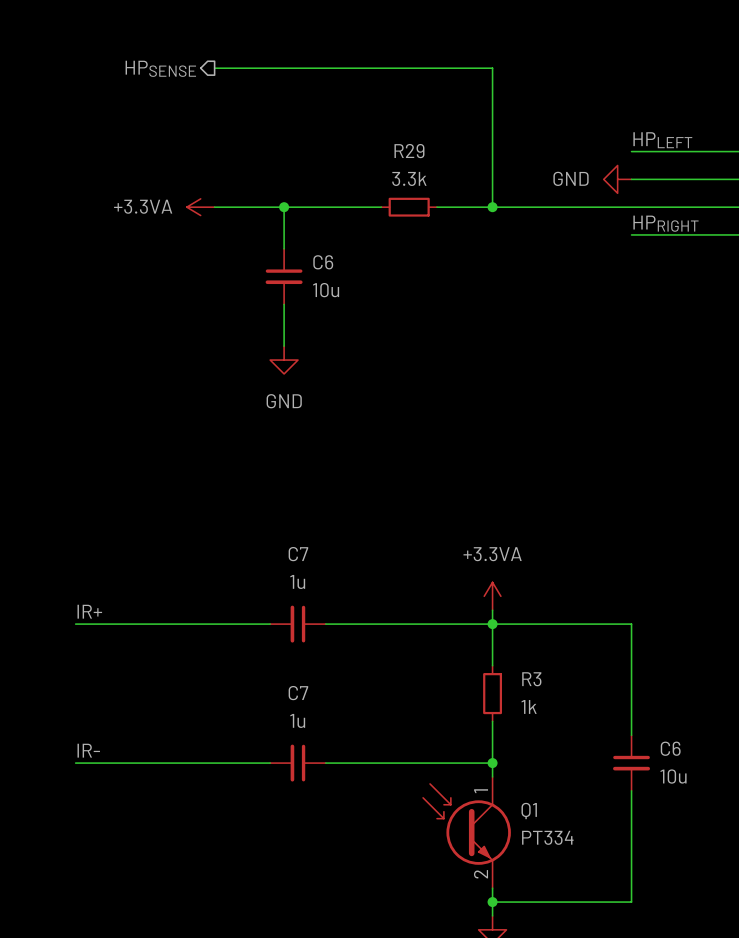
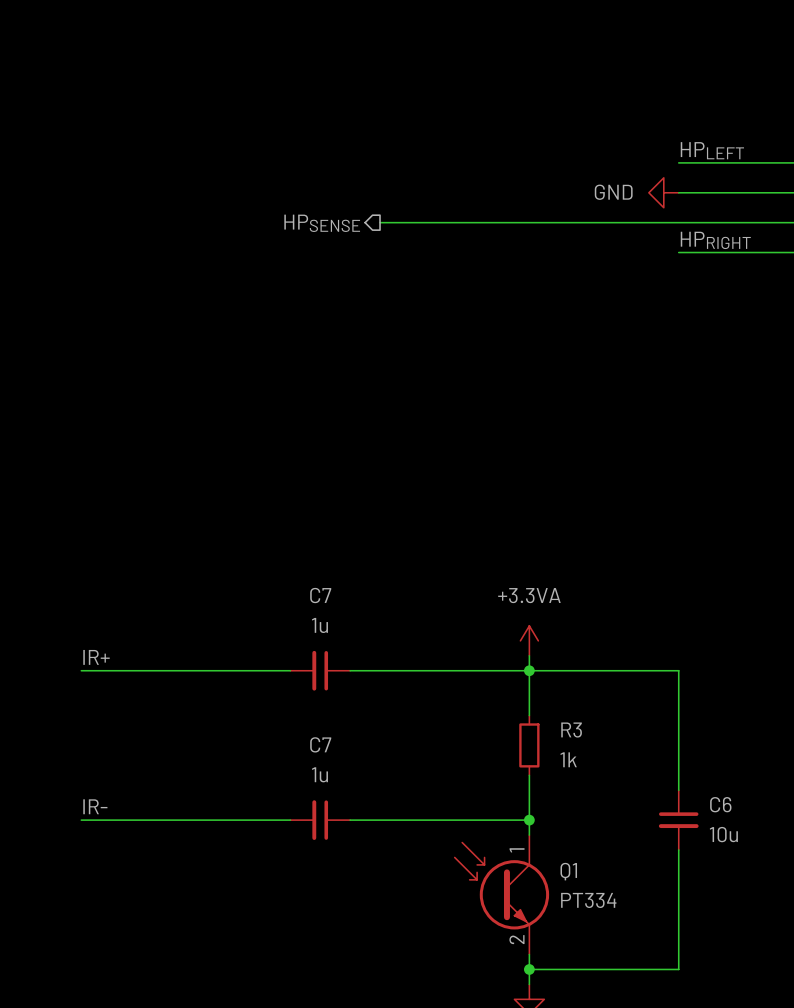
hierarchical label position: HPSENSE (160, 68) -> HPSENSE (322, 223)
wire: (214, 68) (492, 68) (492, 207) -> none
power symbol: +3.3VA (200, 207) -> none
wire: (214, 207) (353, 207) -> none
wire: (284, 207) (284, 248) -> none
junction: (284, 207) -> none
wire: none -> (409, 222) (469, 222)
R29: 3.3k (409, 207) -> none
junction: (492, 207) -> none
C6: 10u (284, 276) -> none
wire: (284, 304) (284, 346) -> none
power symbol: GND (284, 360) -> none

